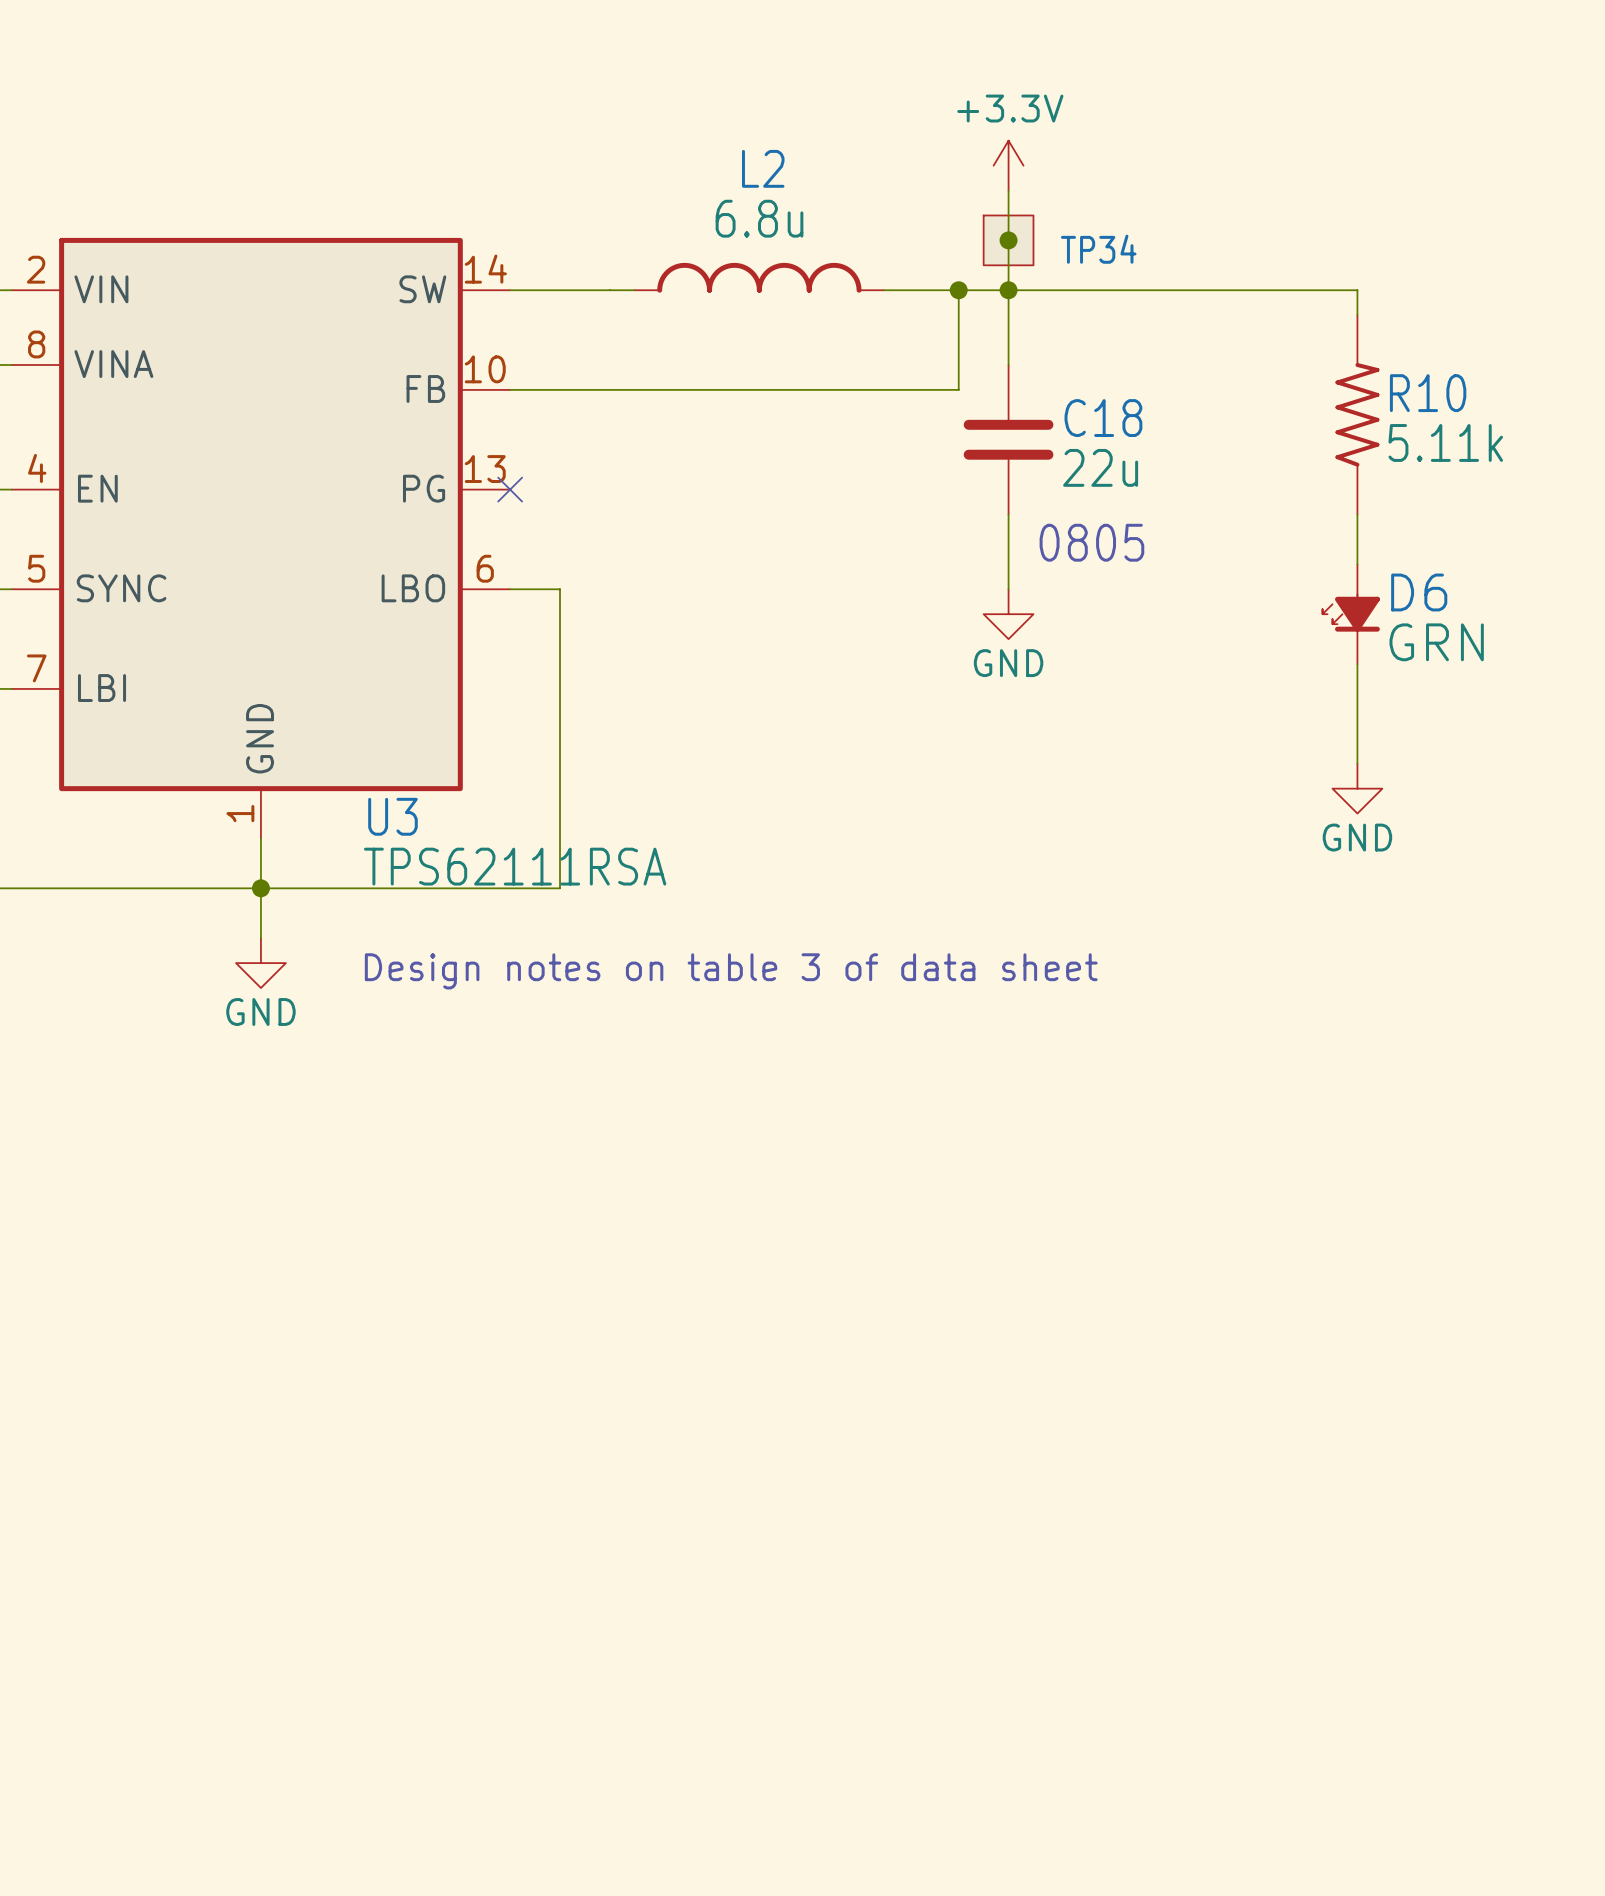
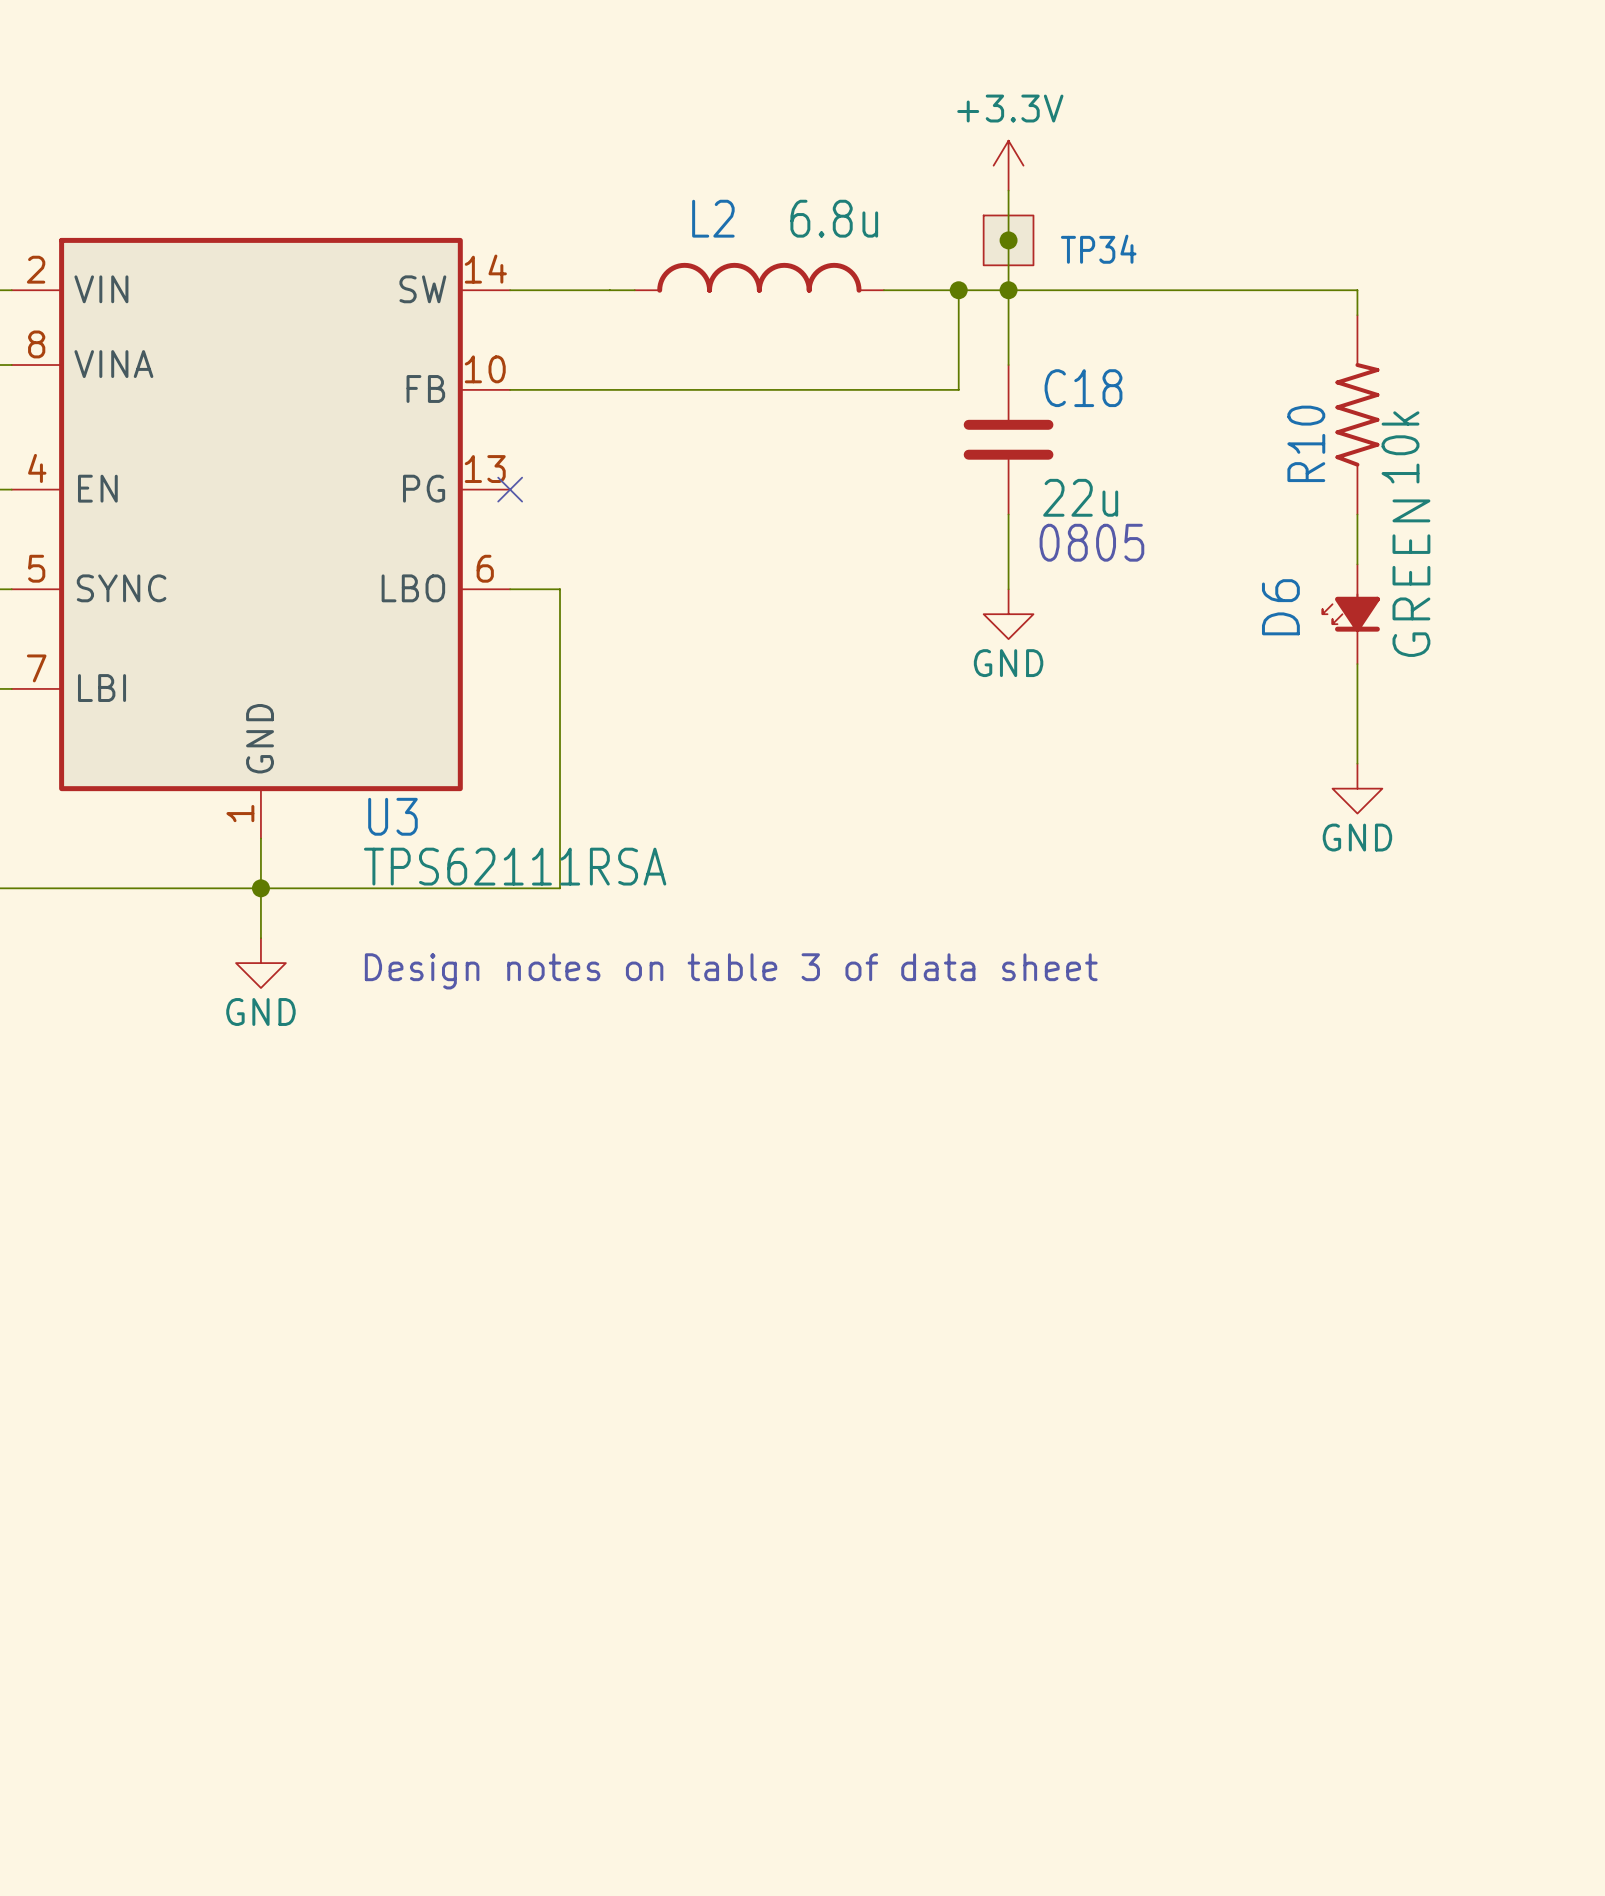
L2 name position: L2 (763, 168) -> L2 (713, 218)
L2 value position: 6.8u (759, 218) -> 6.8u (834, 218)
R10 name rotation: 0° (1428, 393) -> 90° counterclockwise (1306, 443)
R10 name position: R10 (1428, 393) -> R10 (1306, 443)
C18 name position: C18 (1103, 418) -> C18 (1083, 388)
R10 value: 5.11k (1445, 442) -> 10k (1400, 447)
C18 value position: 22u (1100, 467) -> 22u (1080, 497)
D6 name rotation: 0° (1419, 592) -> 90° counterclockwise (1280, 607)
D6 name position: D6 (1419, 592) -> D6 (1280, 607)
D6 value: GRN (1436, 642) -> GREEN (1411, 578)

